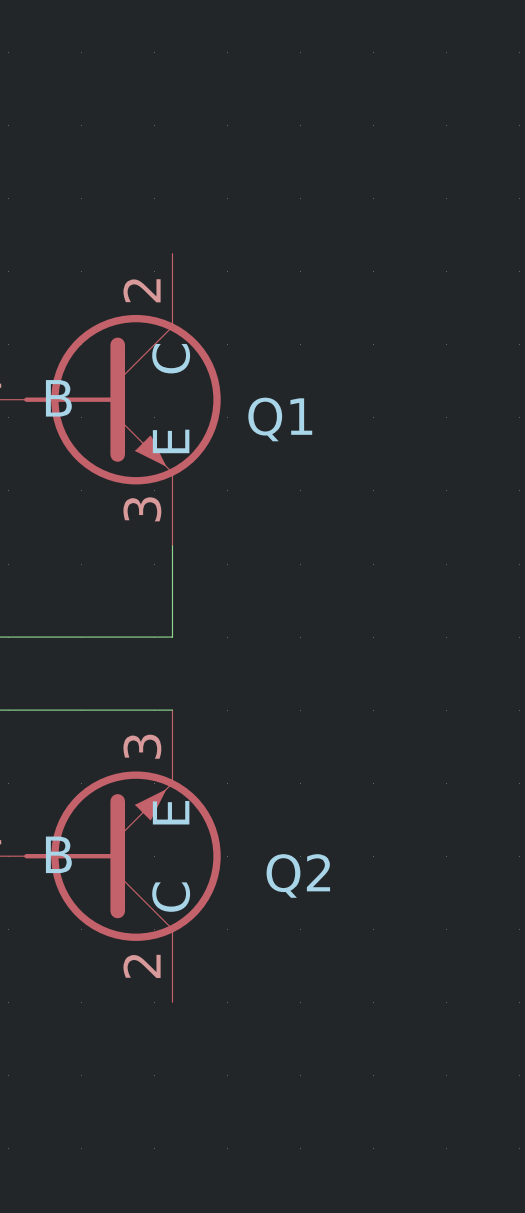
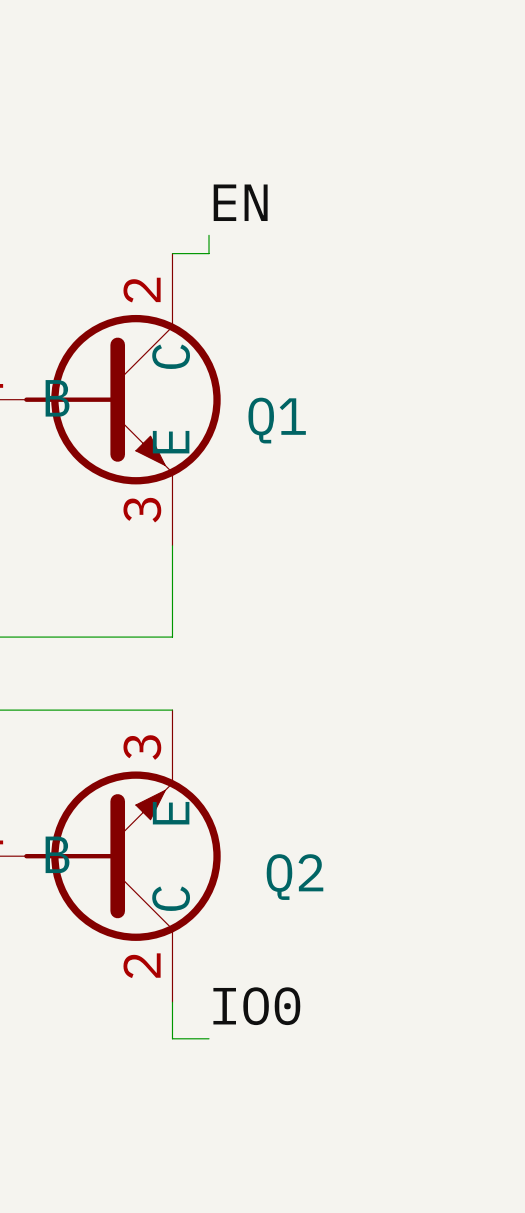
label: none -> EN (240, 202)
wire: none -> (209, 235) (209, 253) (172, 253)
wire: none -> (172, 1002) (172, 1038) (209, 1038)
label: none -> IO0 (256, 1006)

